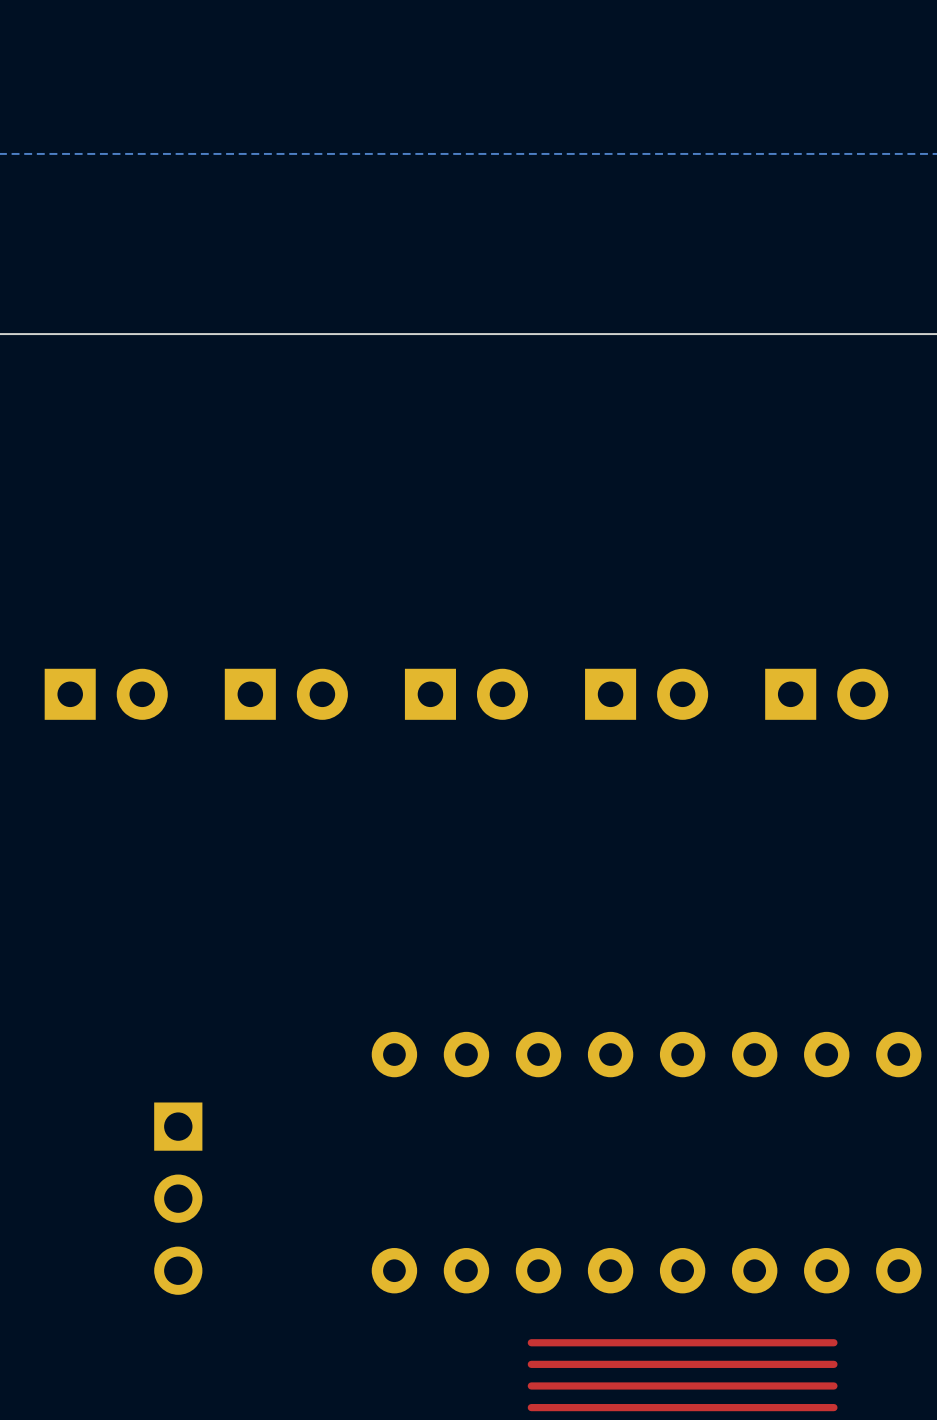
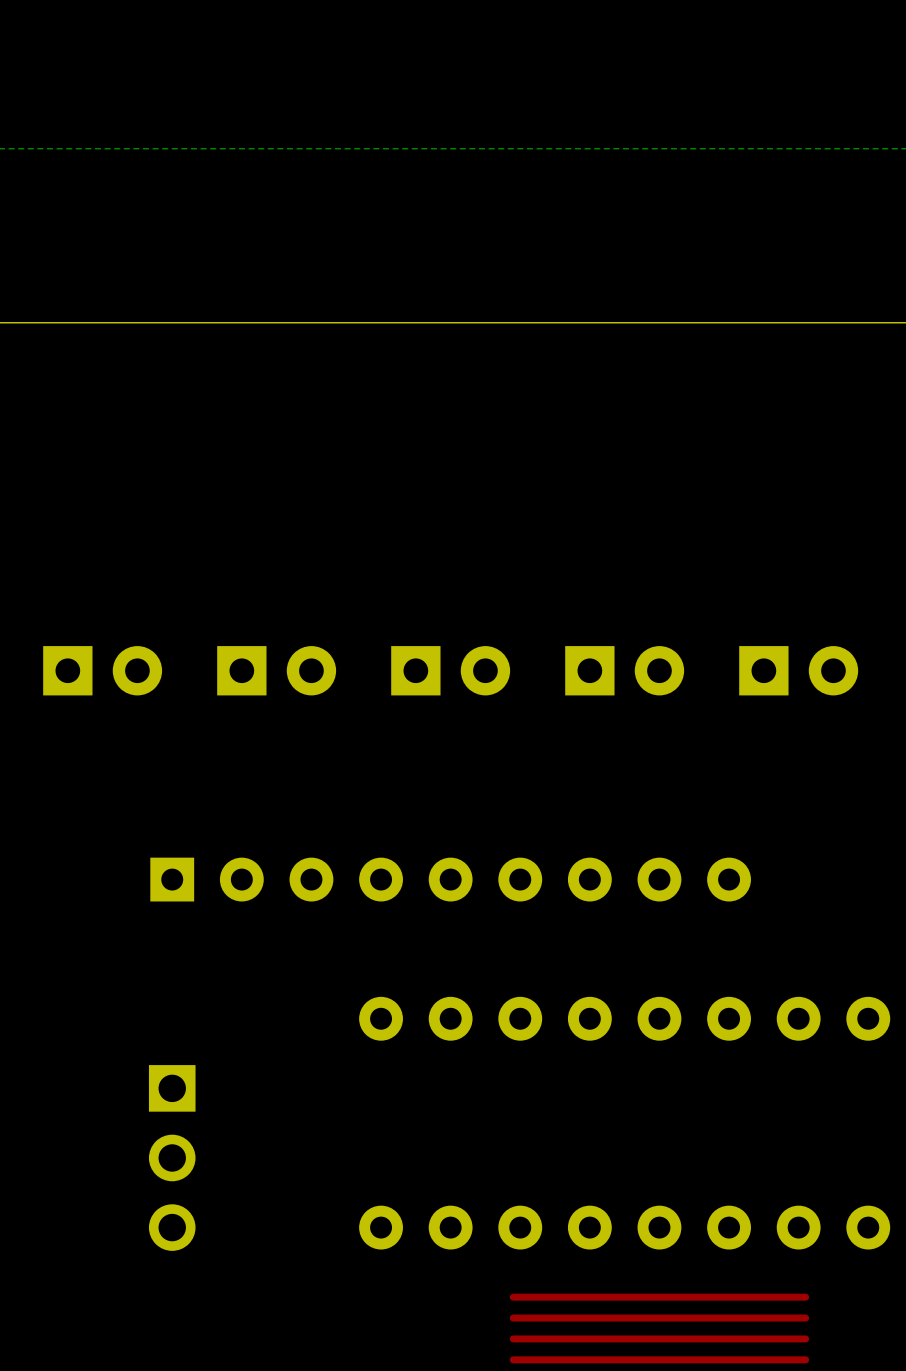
part: none -> (450, 879)

